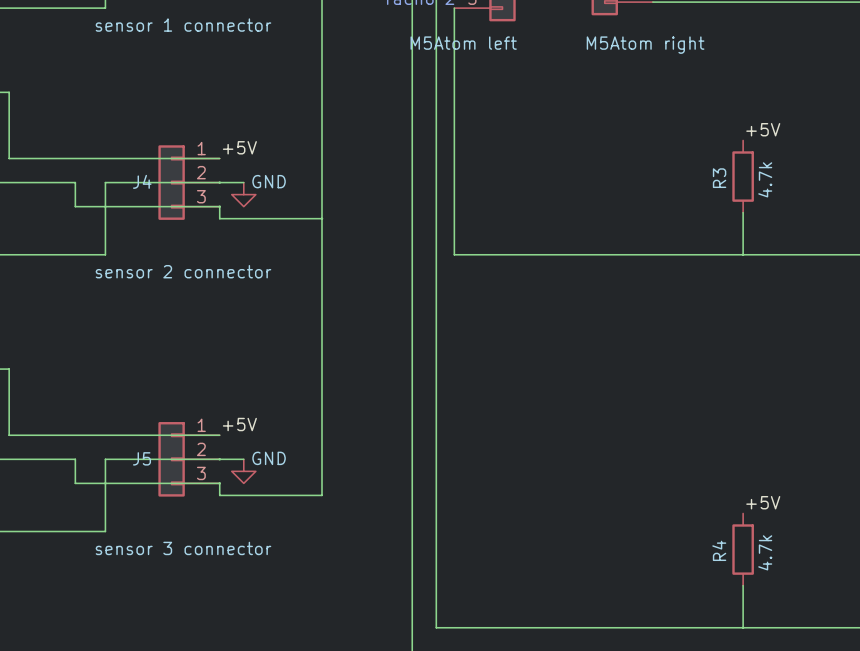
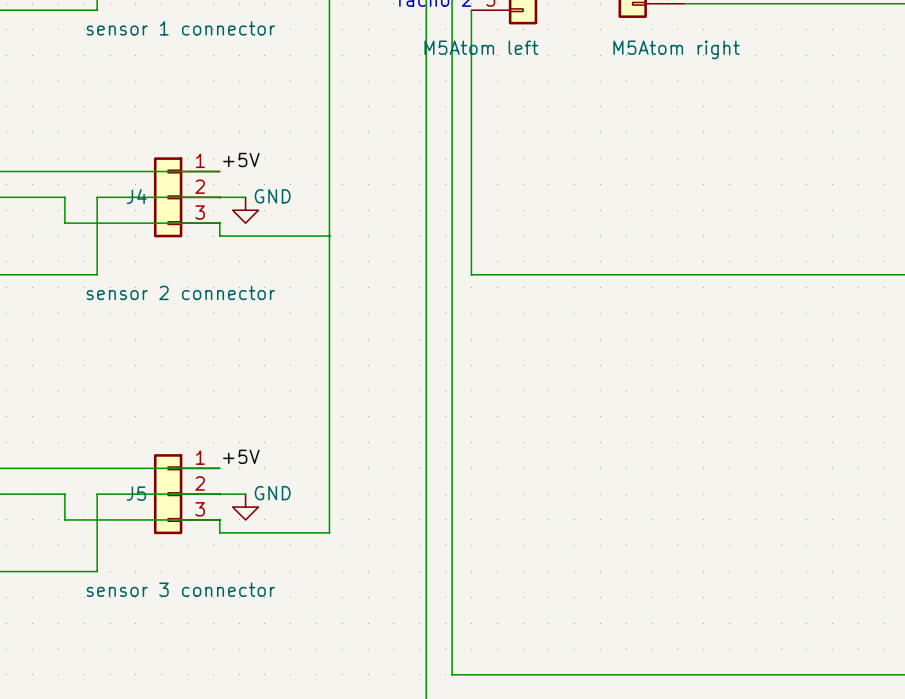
label: +5V (763, 129) -> none
R3: 4.7k (743, 176) -> none
wire: (743, 212) (743, 254) -> none
label: +5V (763, 502) -> none
R4: 4.7k (743, 549) -> none
wire: (743, 585) (743, 627) -> none

